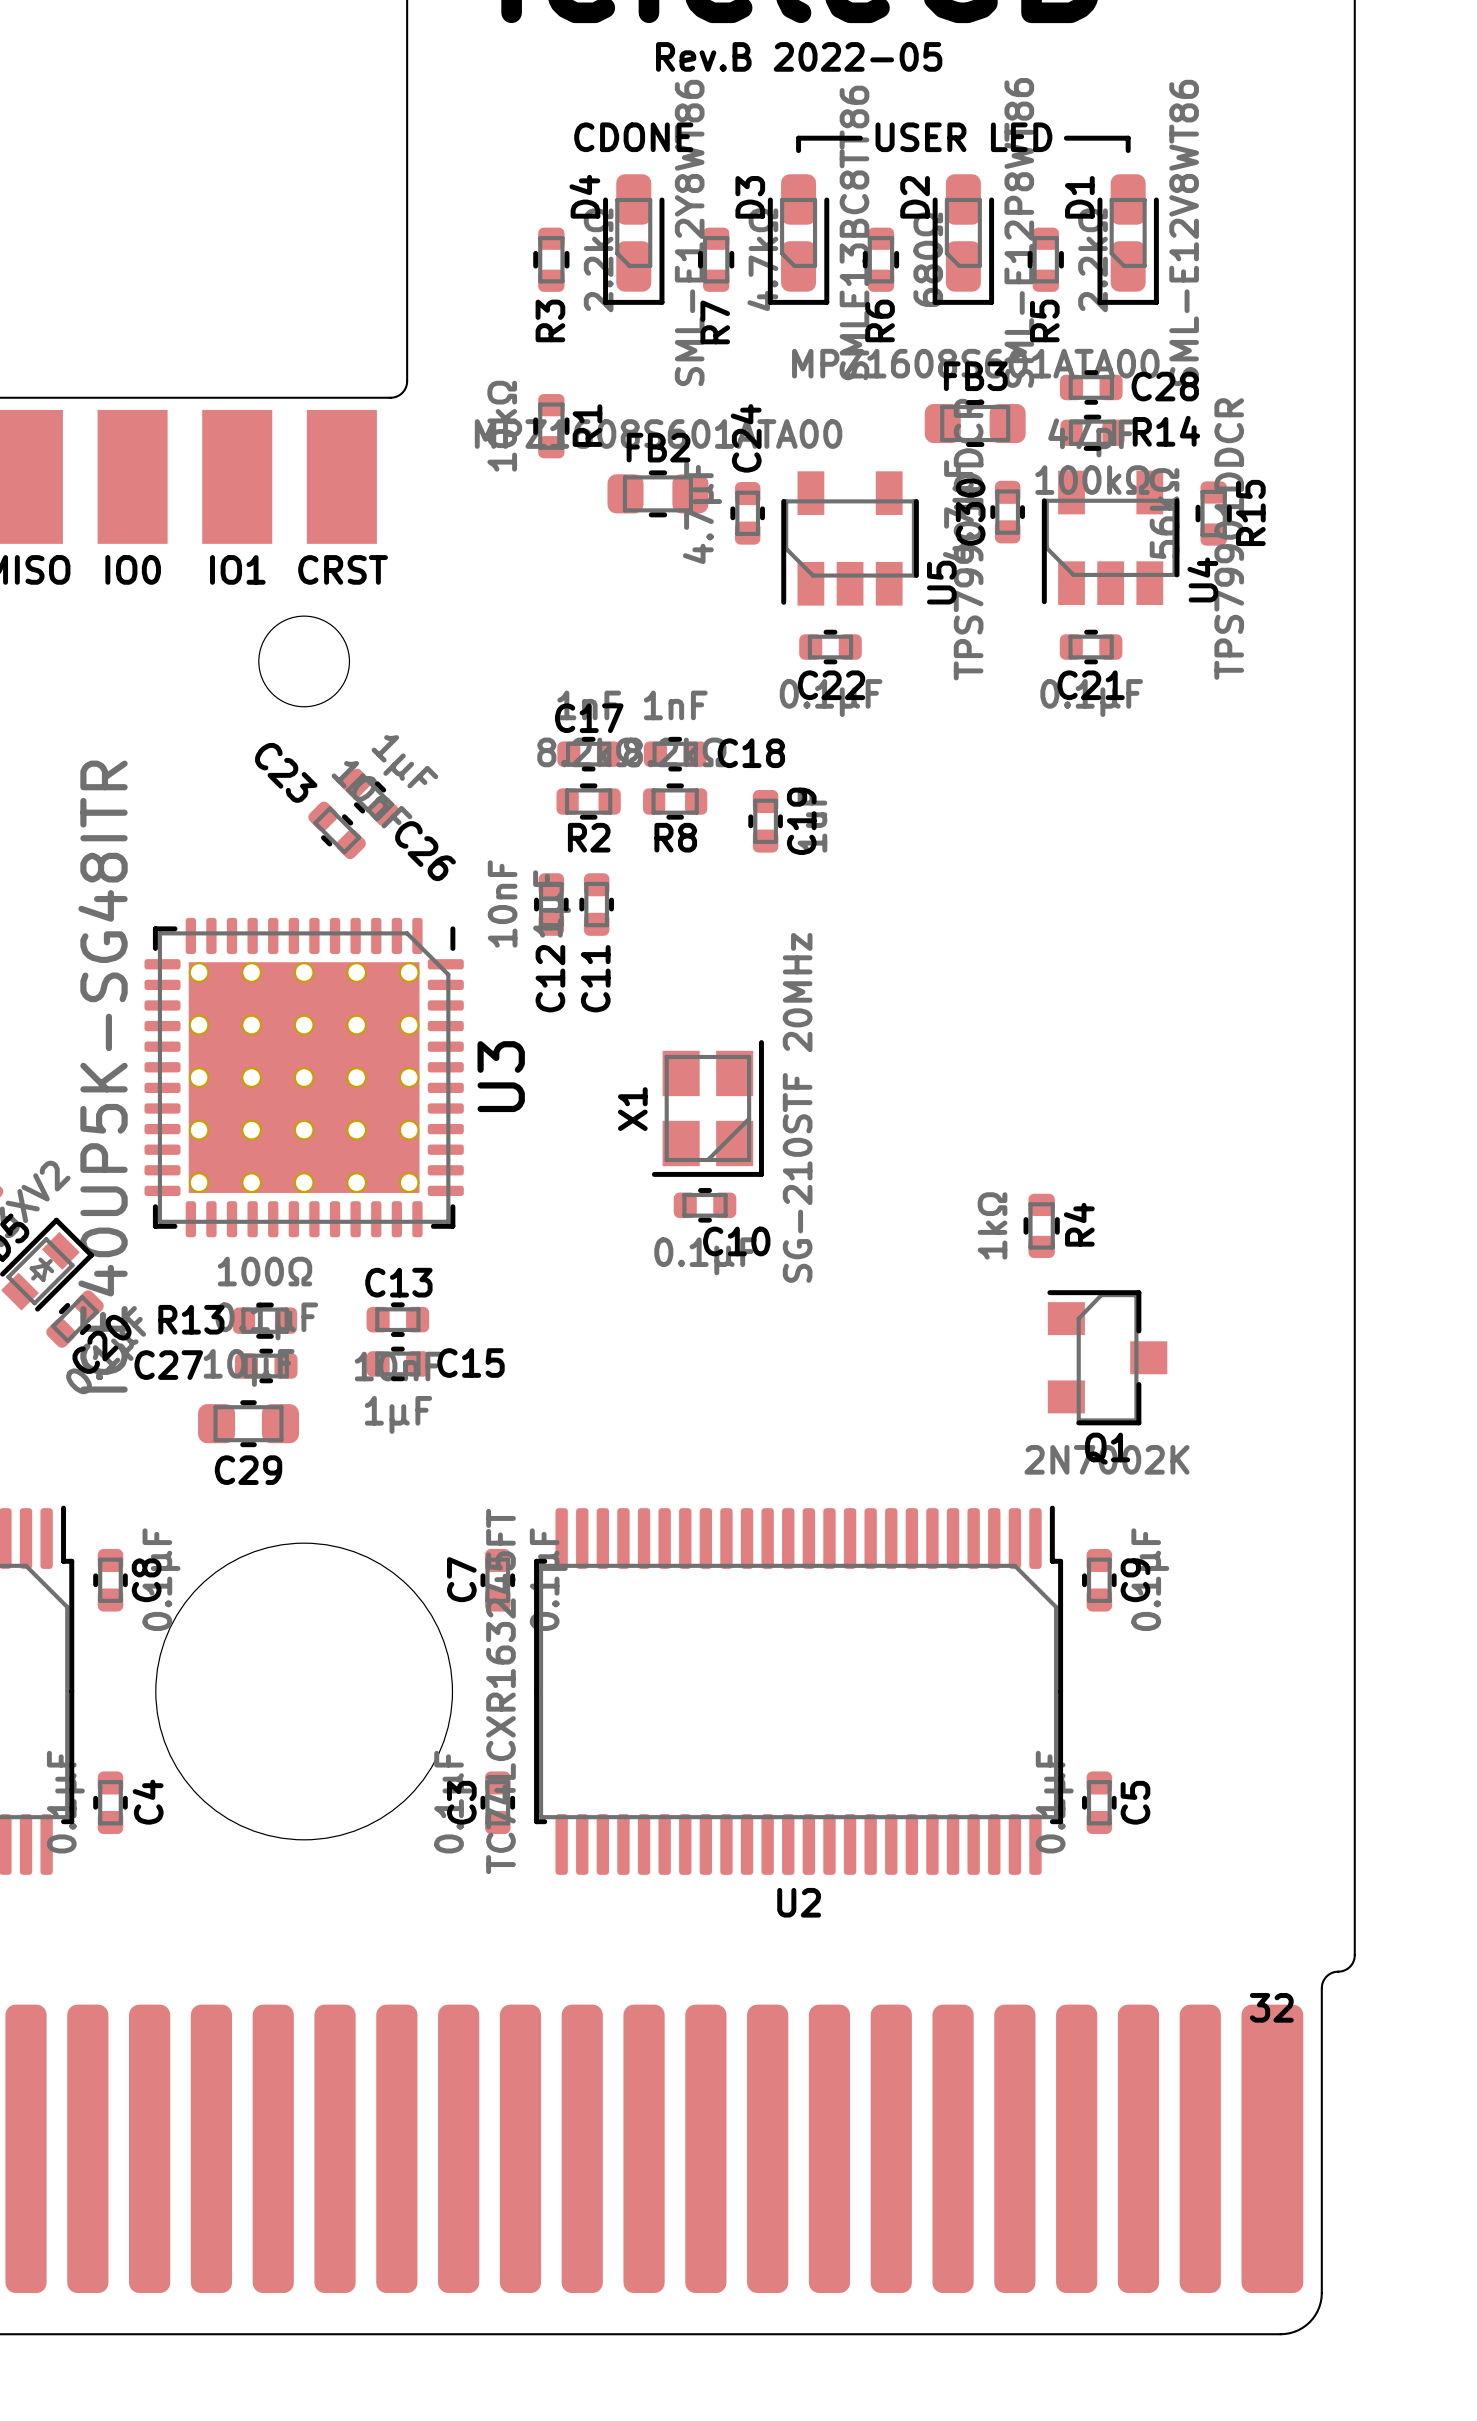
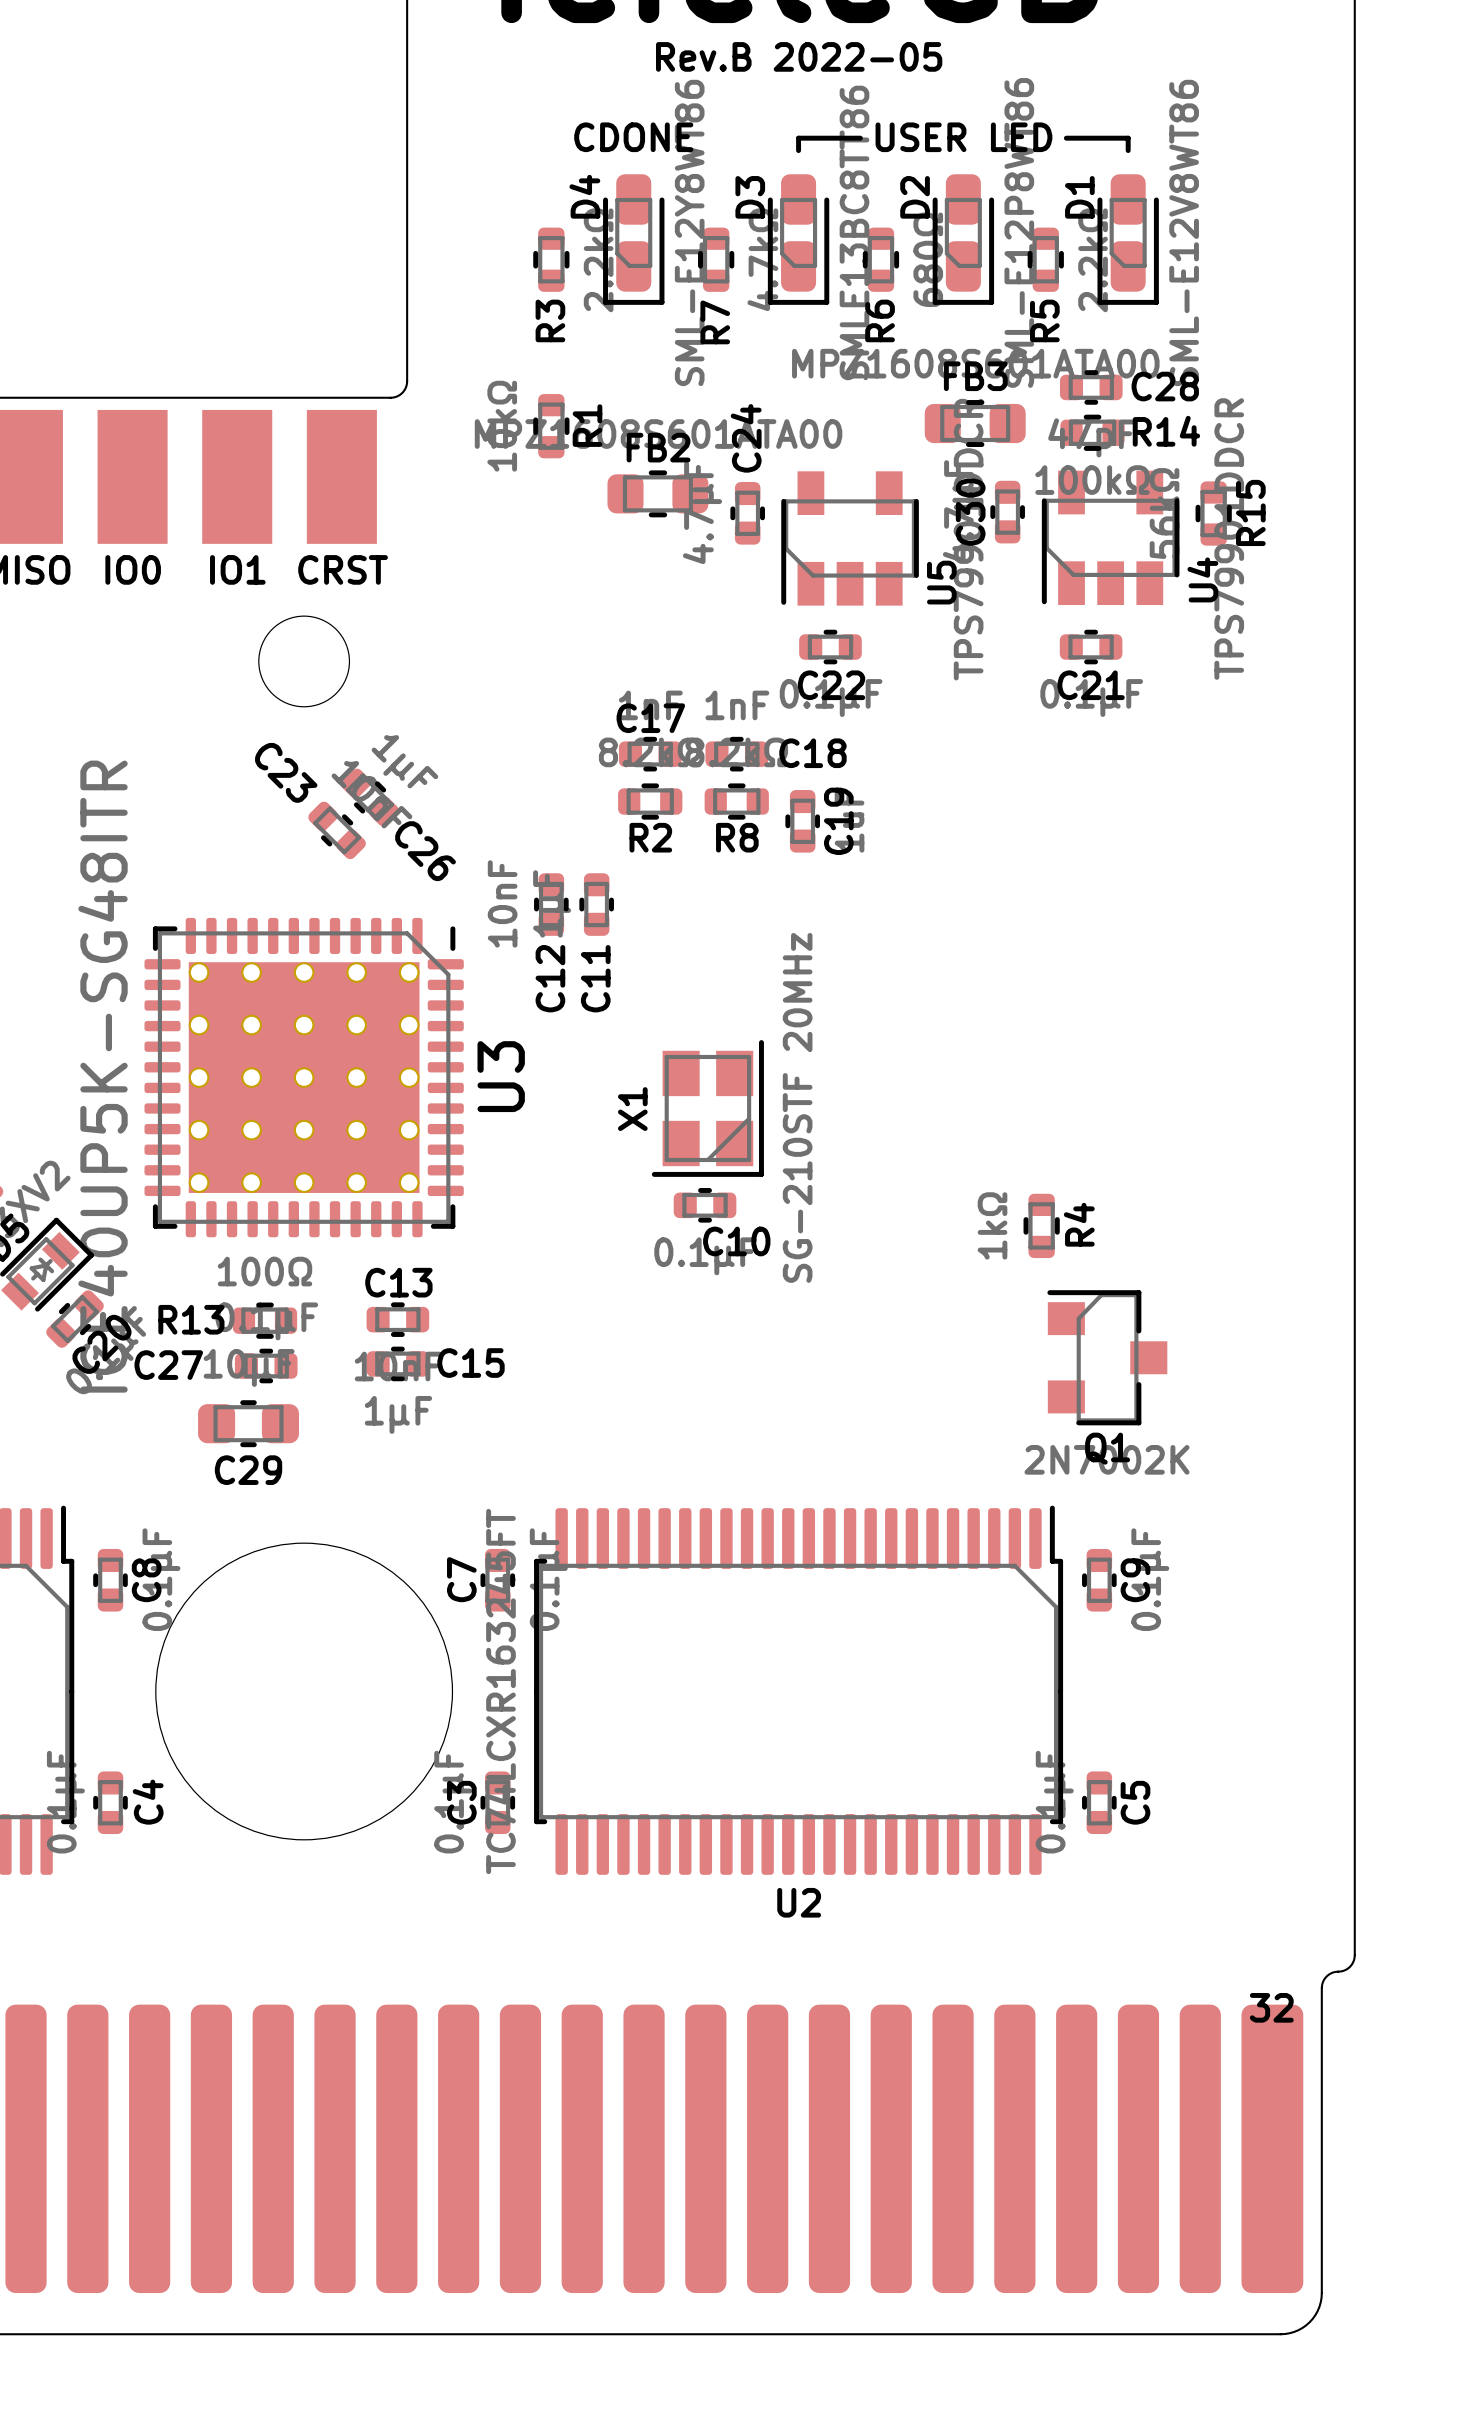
C17 position: (588, 754) -> (650, 754)
C18 position: (675, 754) -> (736, 754)
R2 position: (588, 801) -> (650, 801)
R8 position: (675, 801) -> (736, 801)
C19 position: (765, 821) -> (802, 821)

